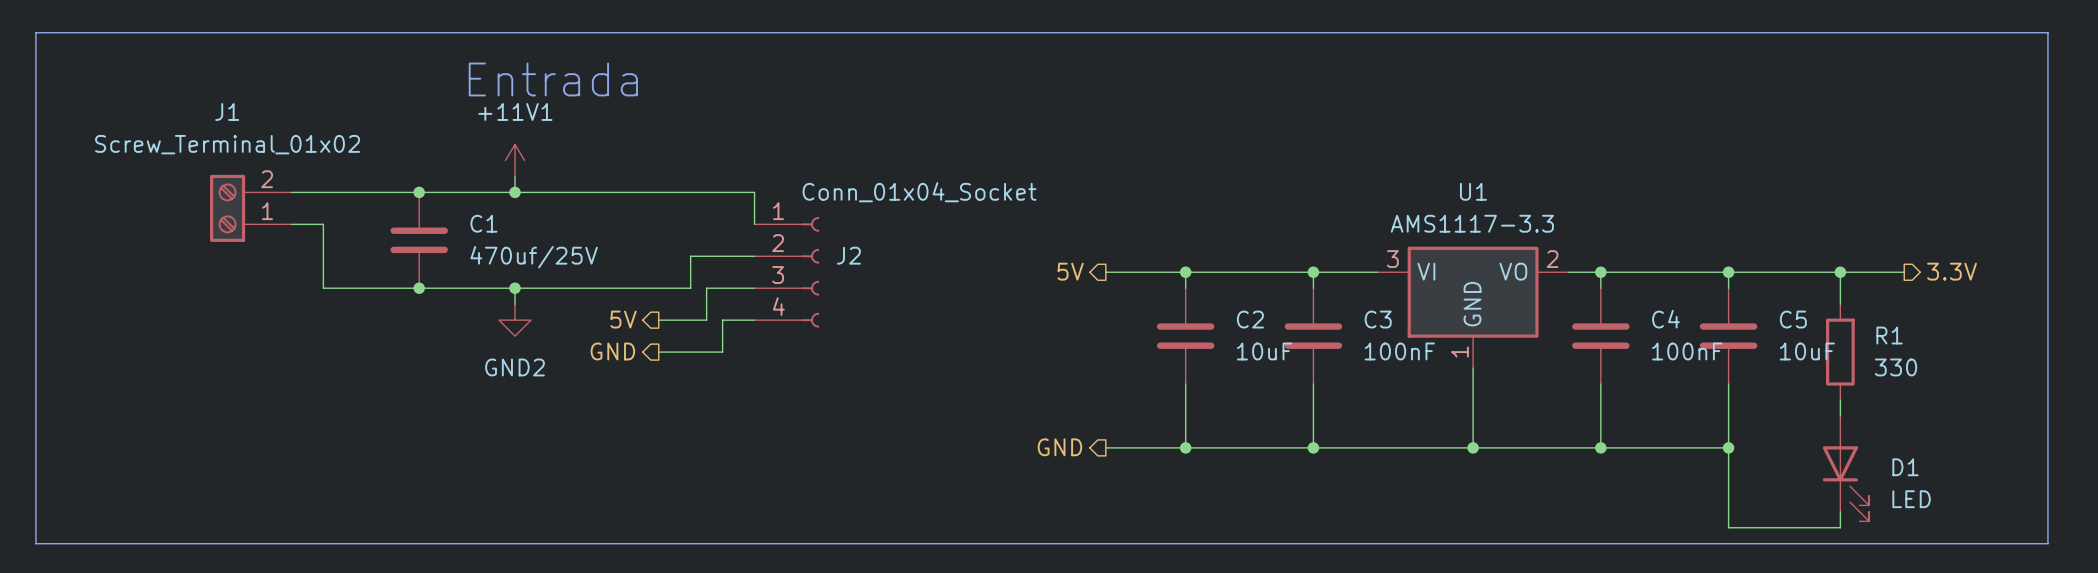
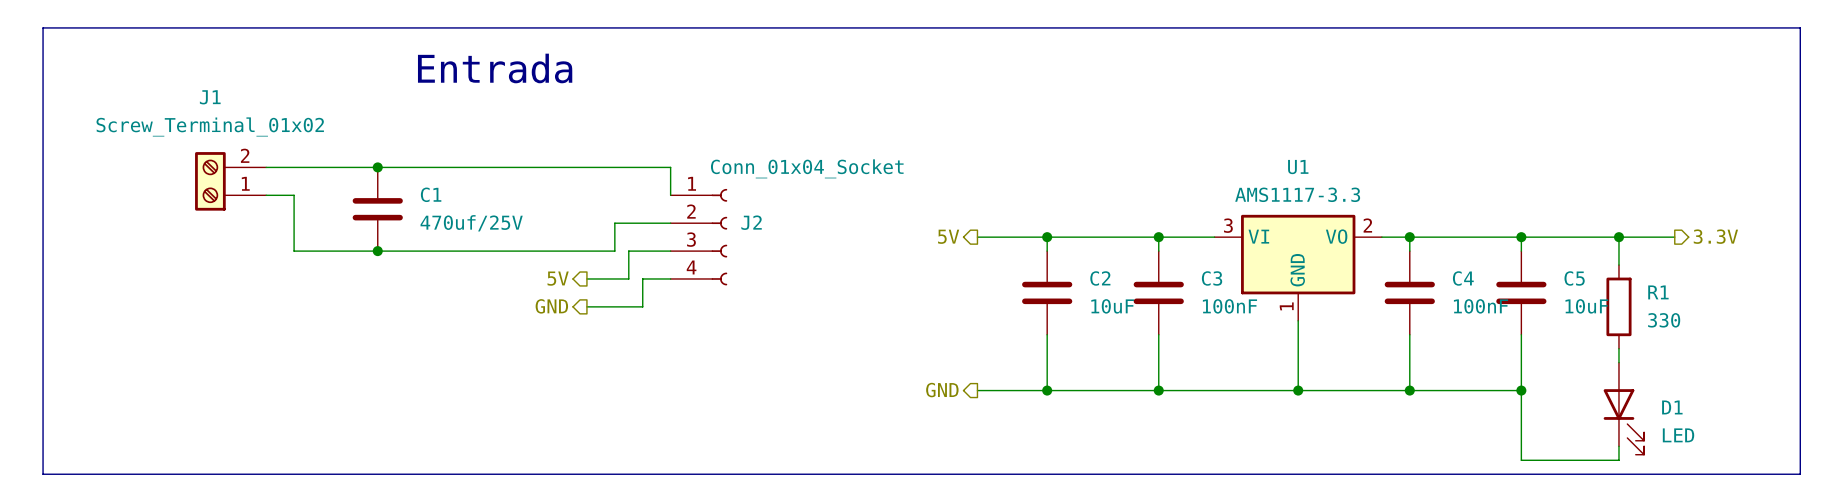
power symbol: +11V1 (515, 160) -> none
wire: (515, 176) (515, 192) -> none
junction: (515, 192) -> none
wire: (515, 288) (515, 304) -> none
junction: (515, 288) -> none
power symbol: GND2 (515, 320) -> none

